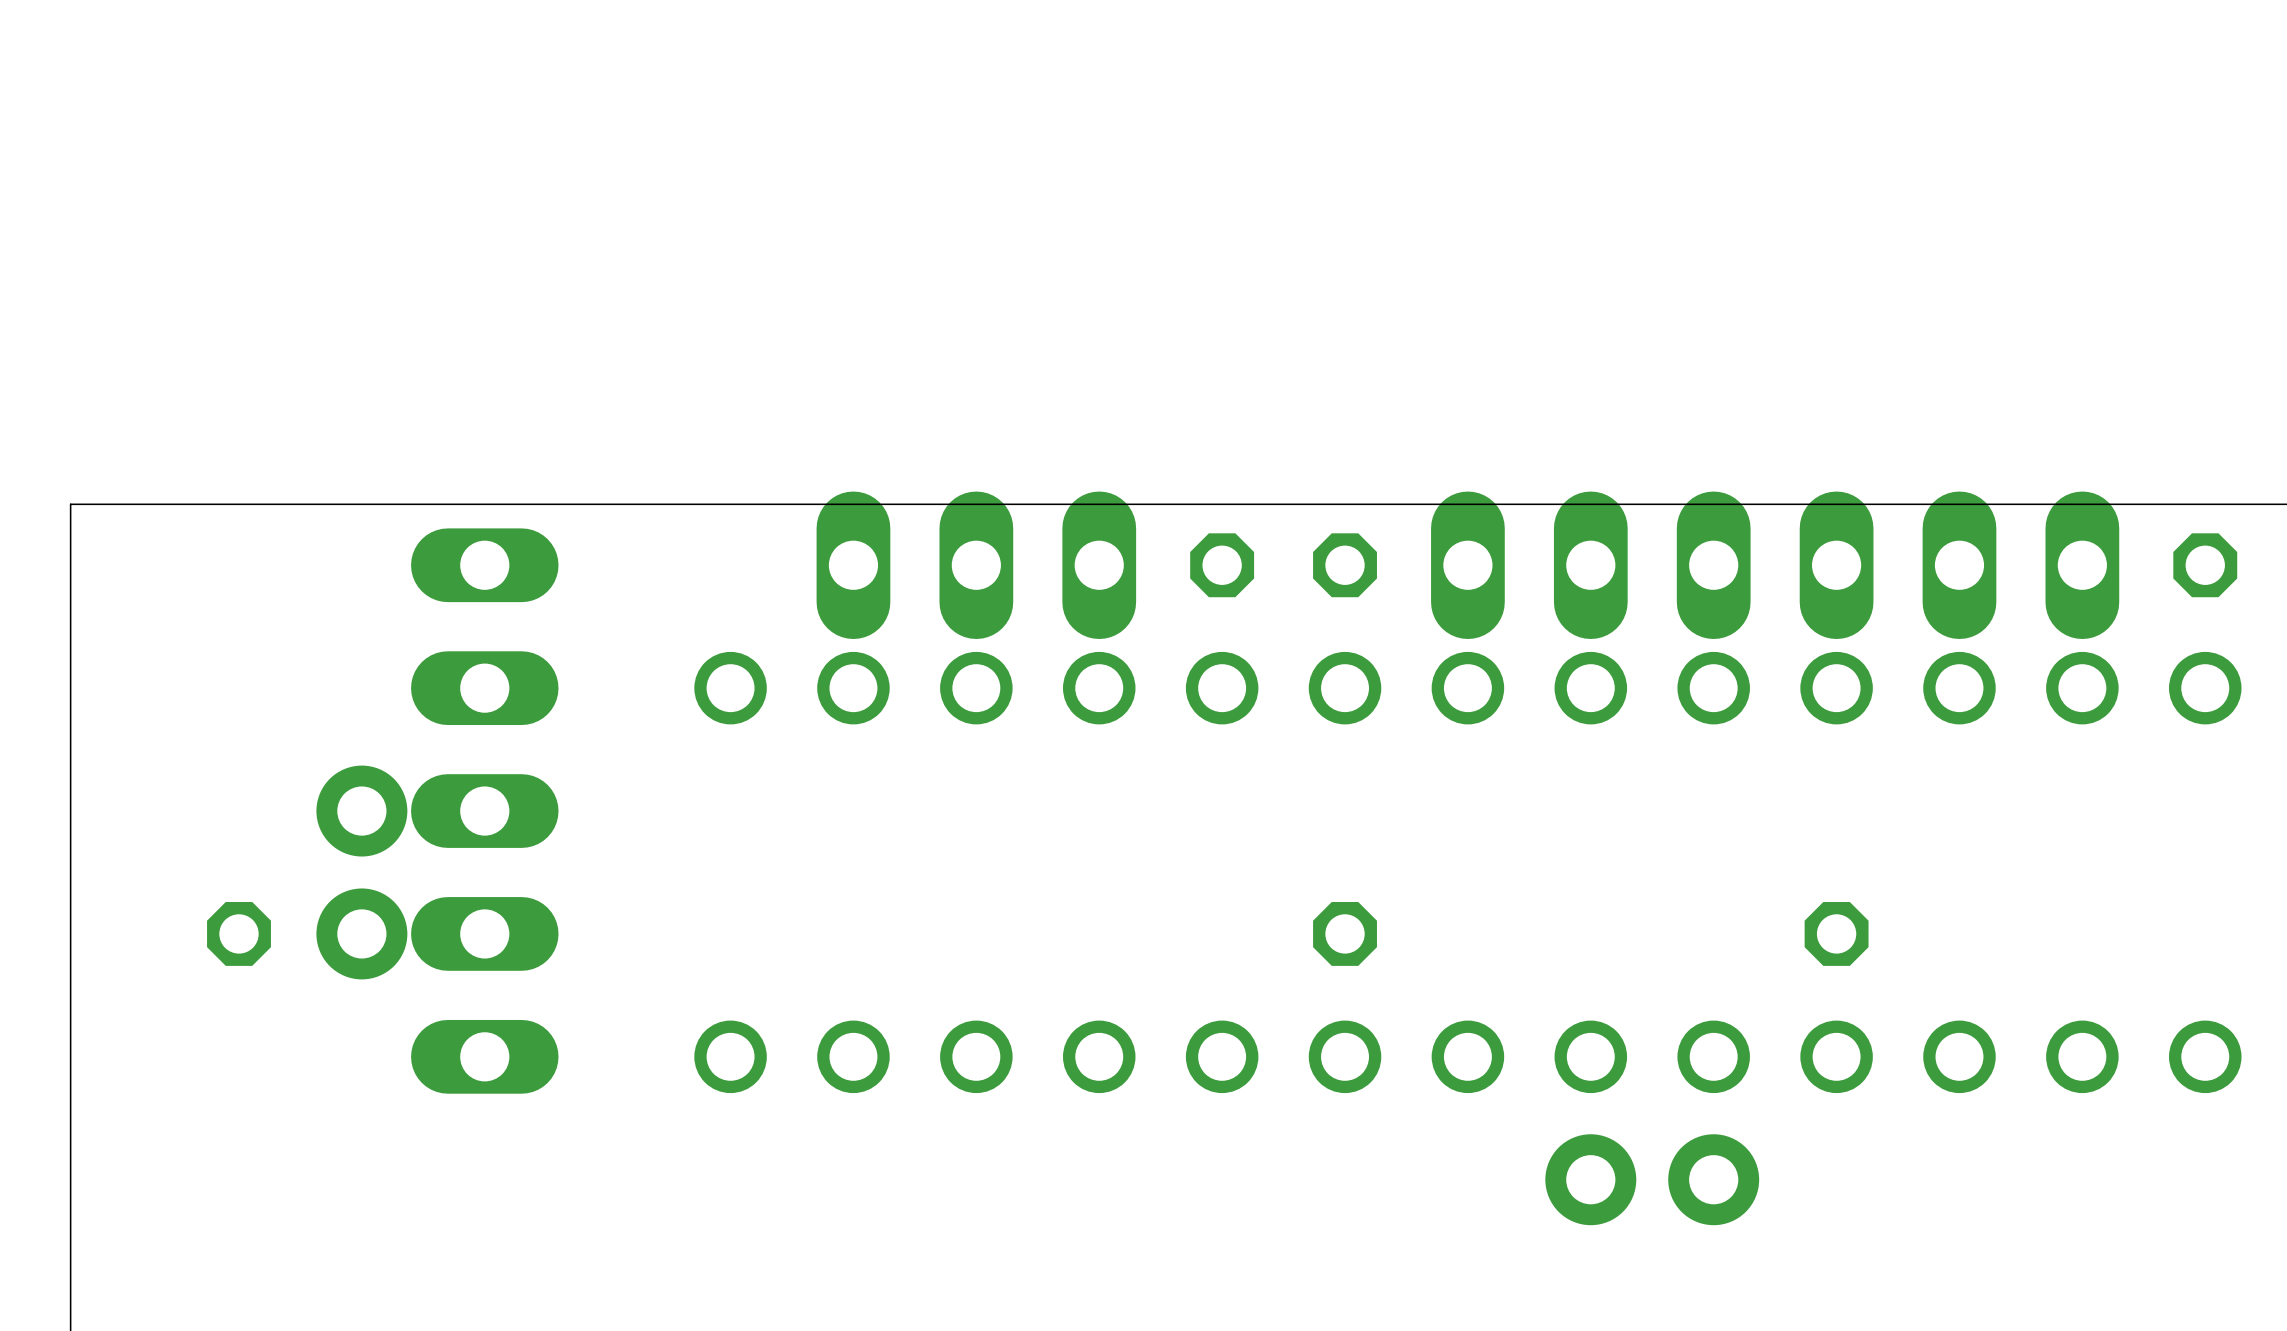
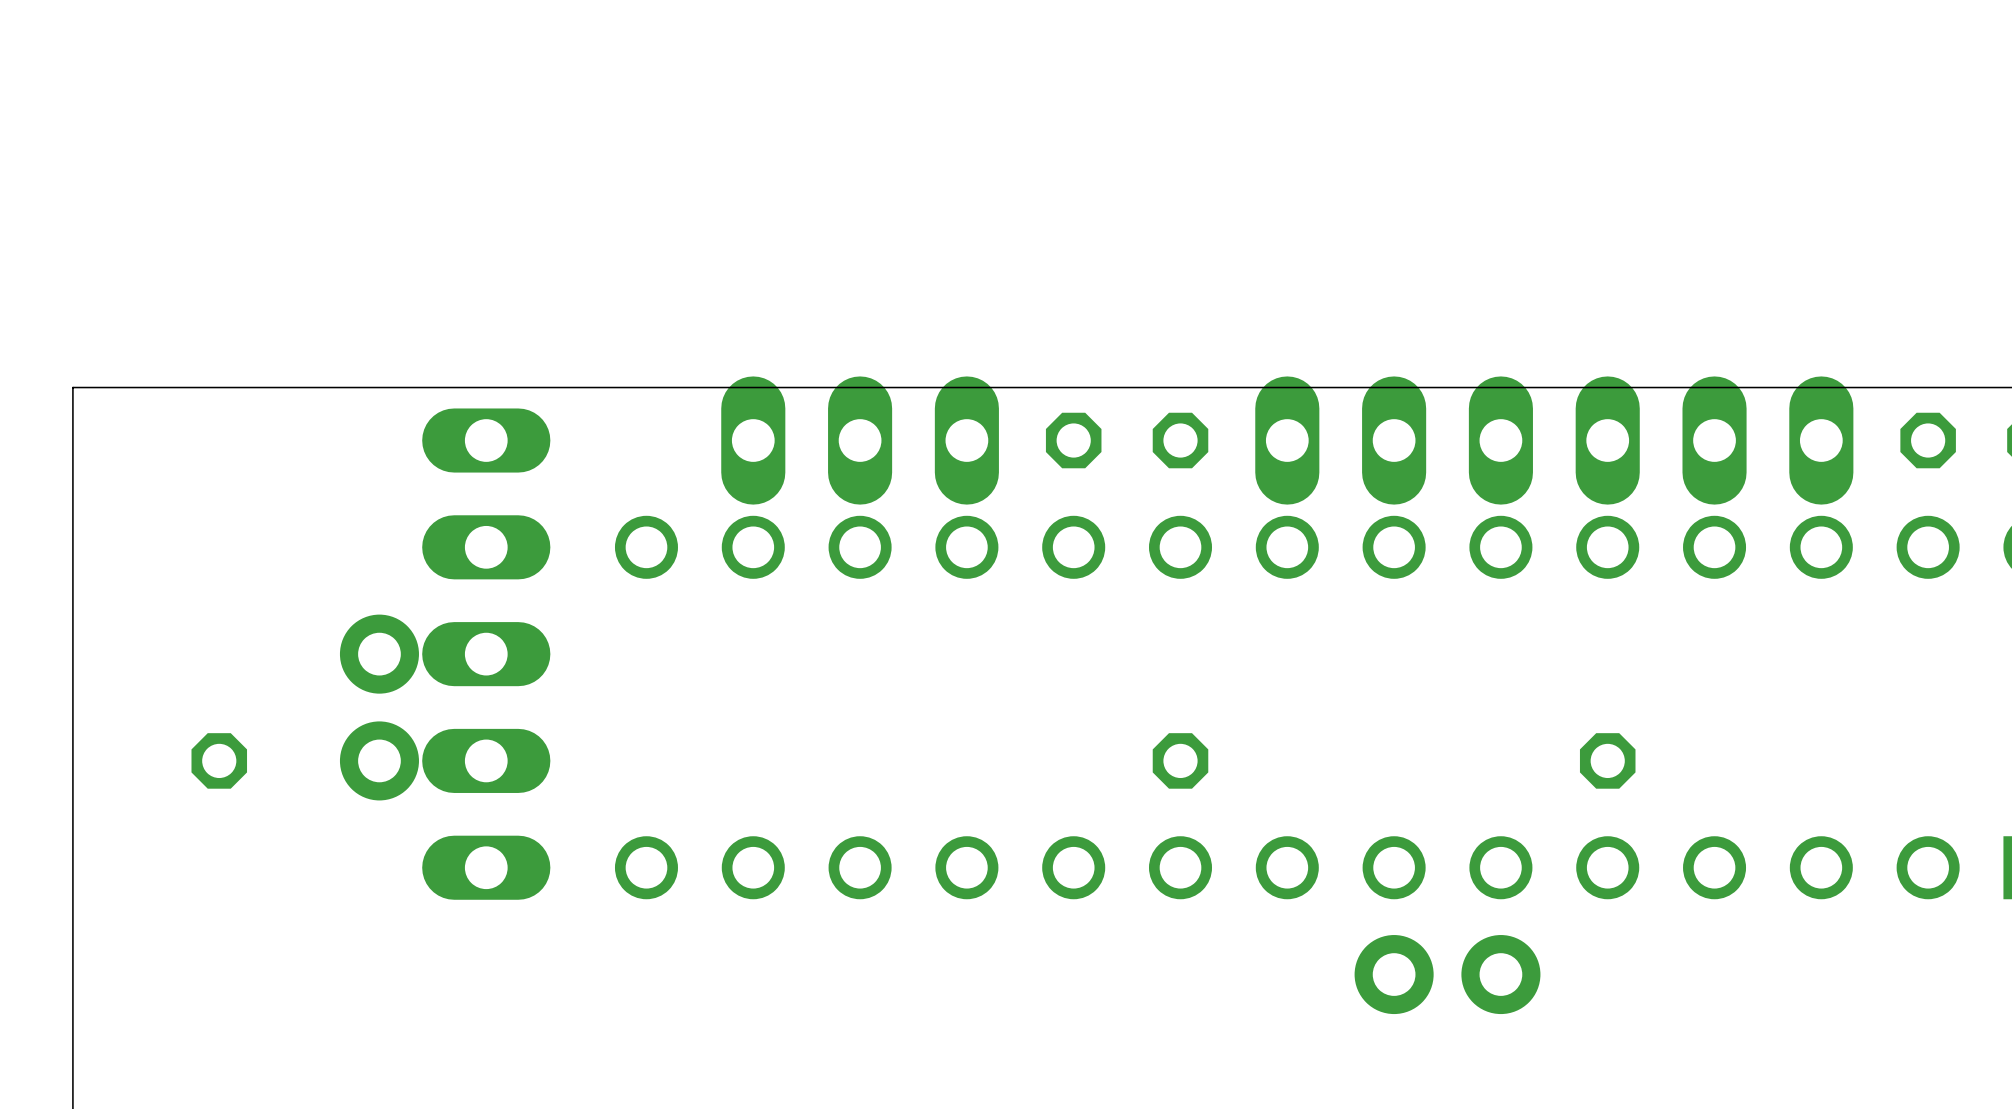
part position: (484, 811) -> (486, 654)
part position: (361, 872) -> (379, 707)

